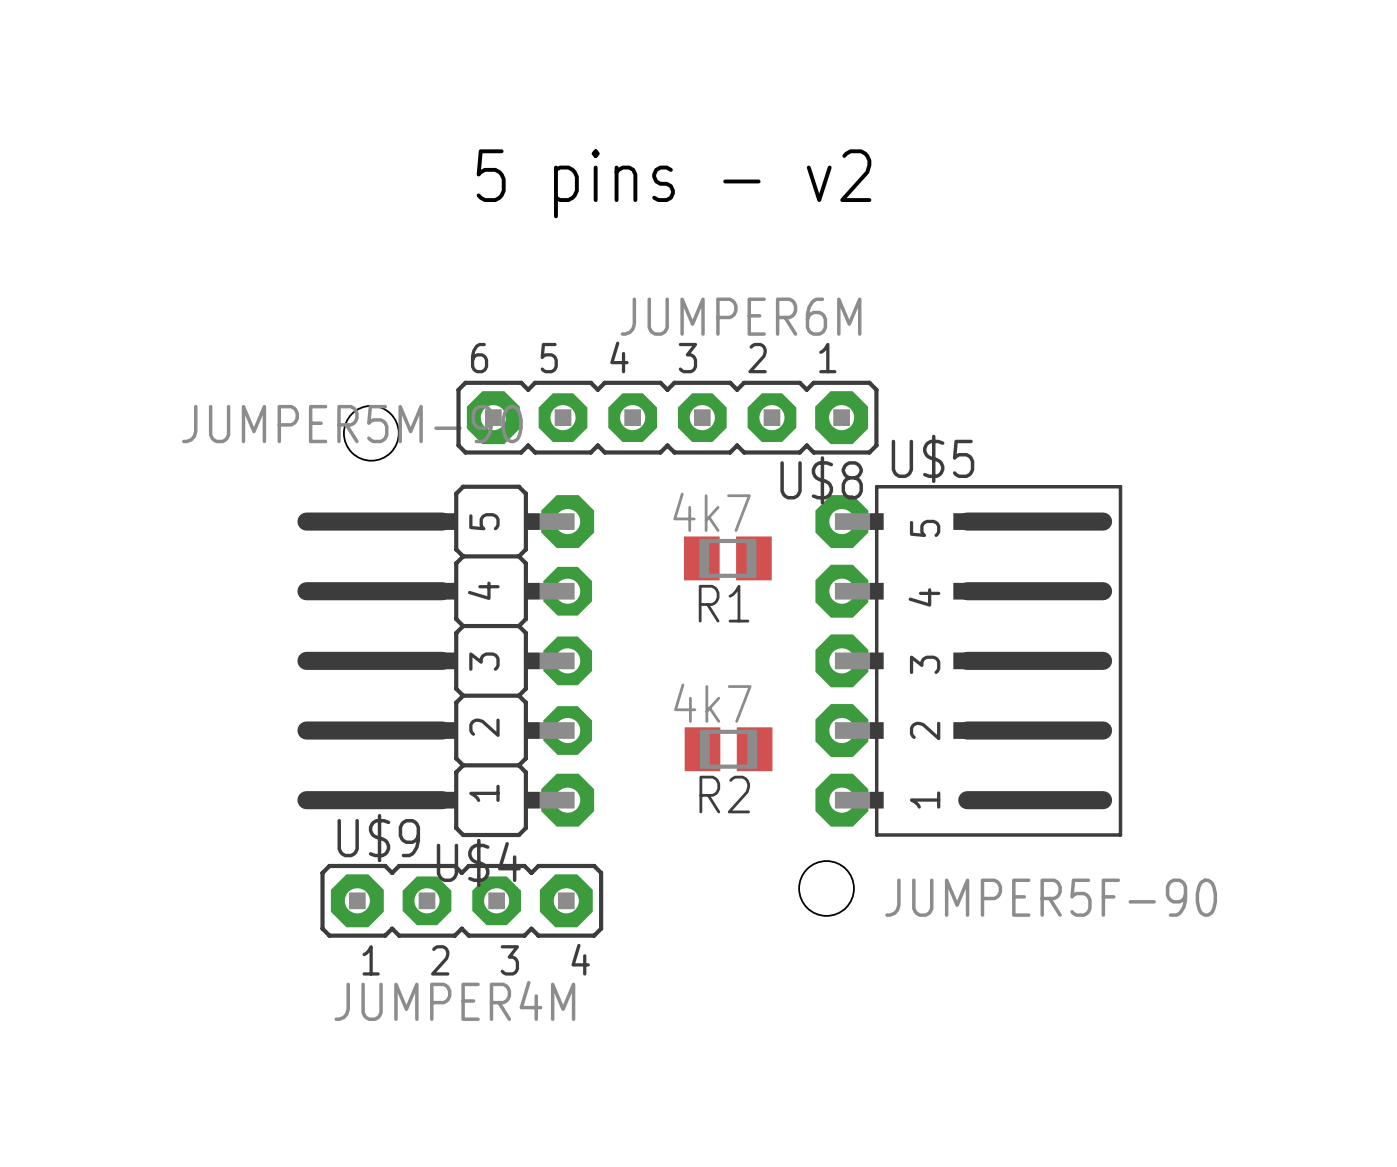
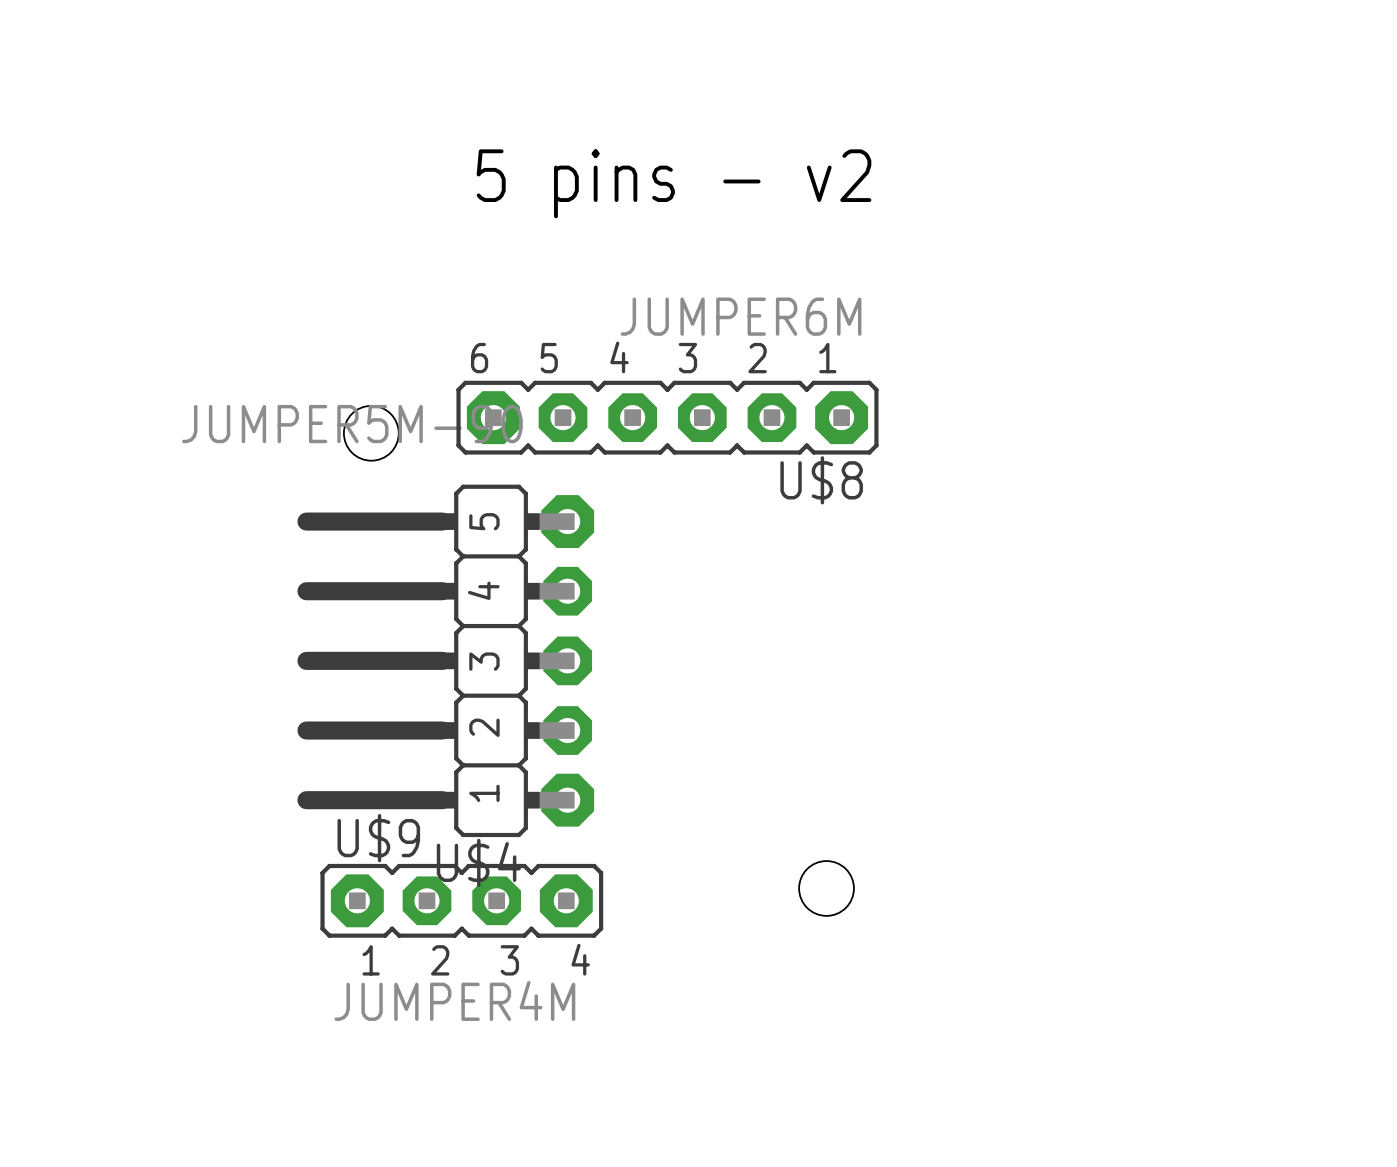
R1: 4k7 (727, 558) -> none
U$5: JUMPER5F-90 (968, 660) -> none
R2: 4k7 (728, 749) -> none

